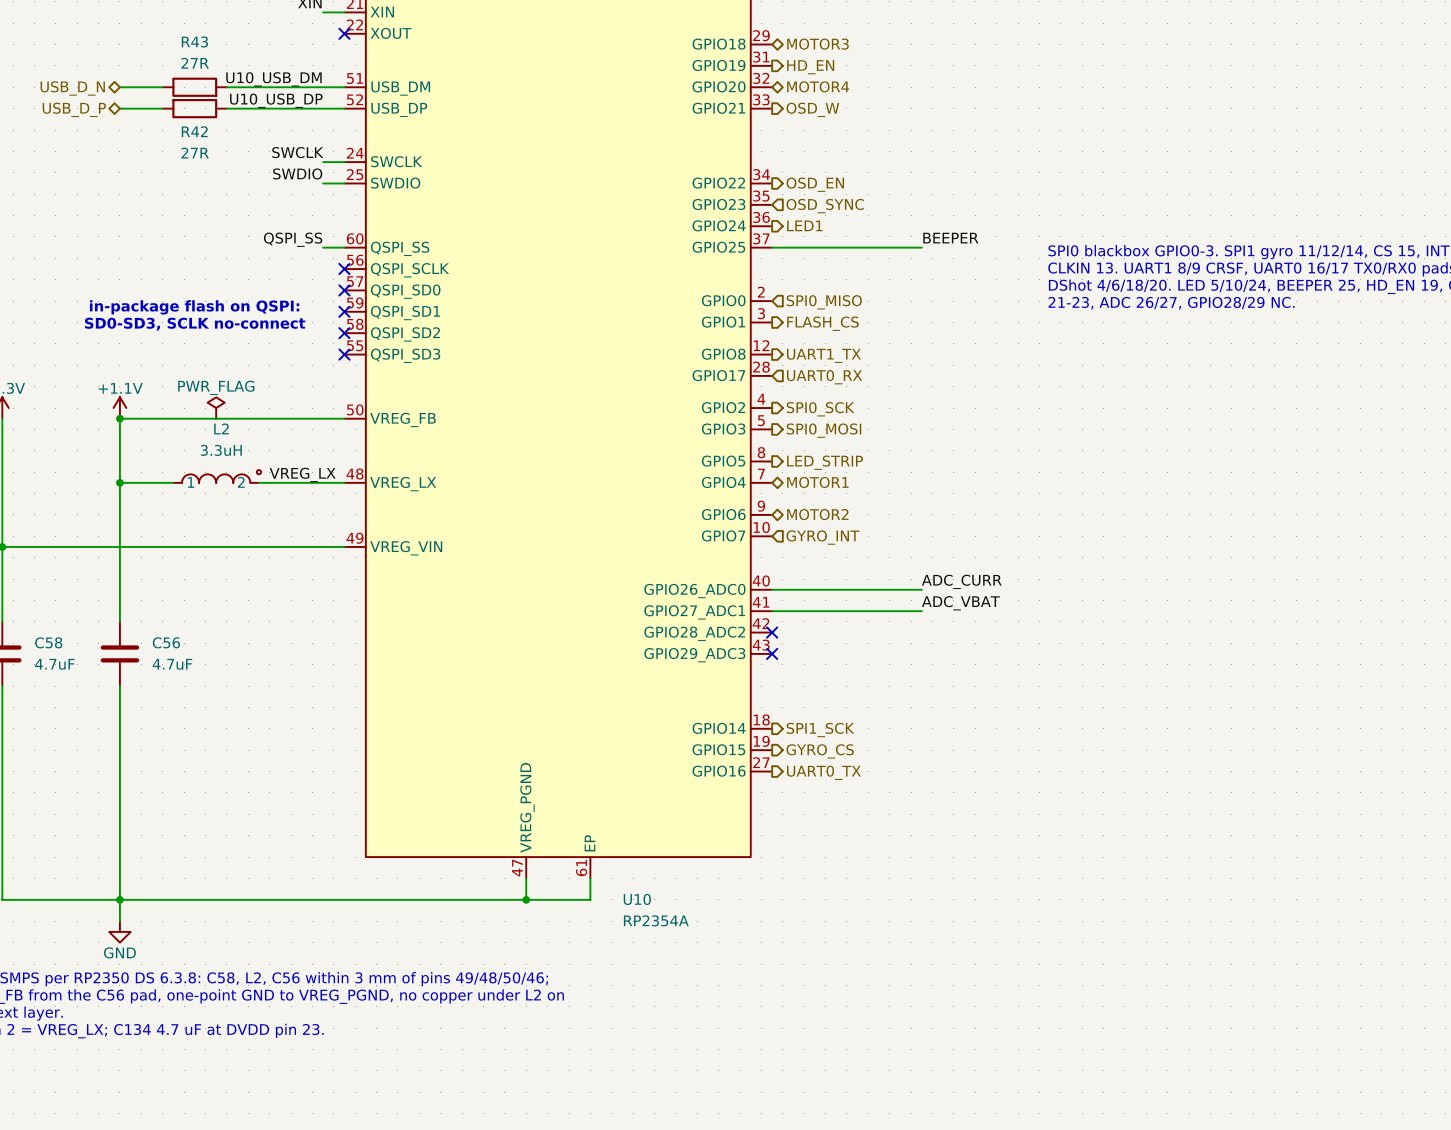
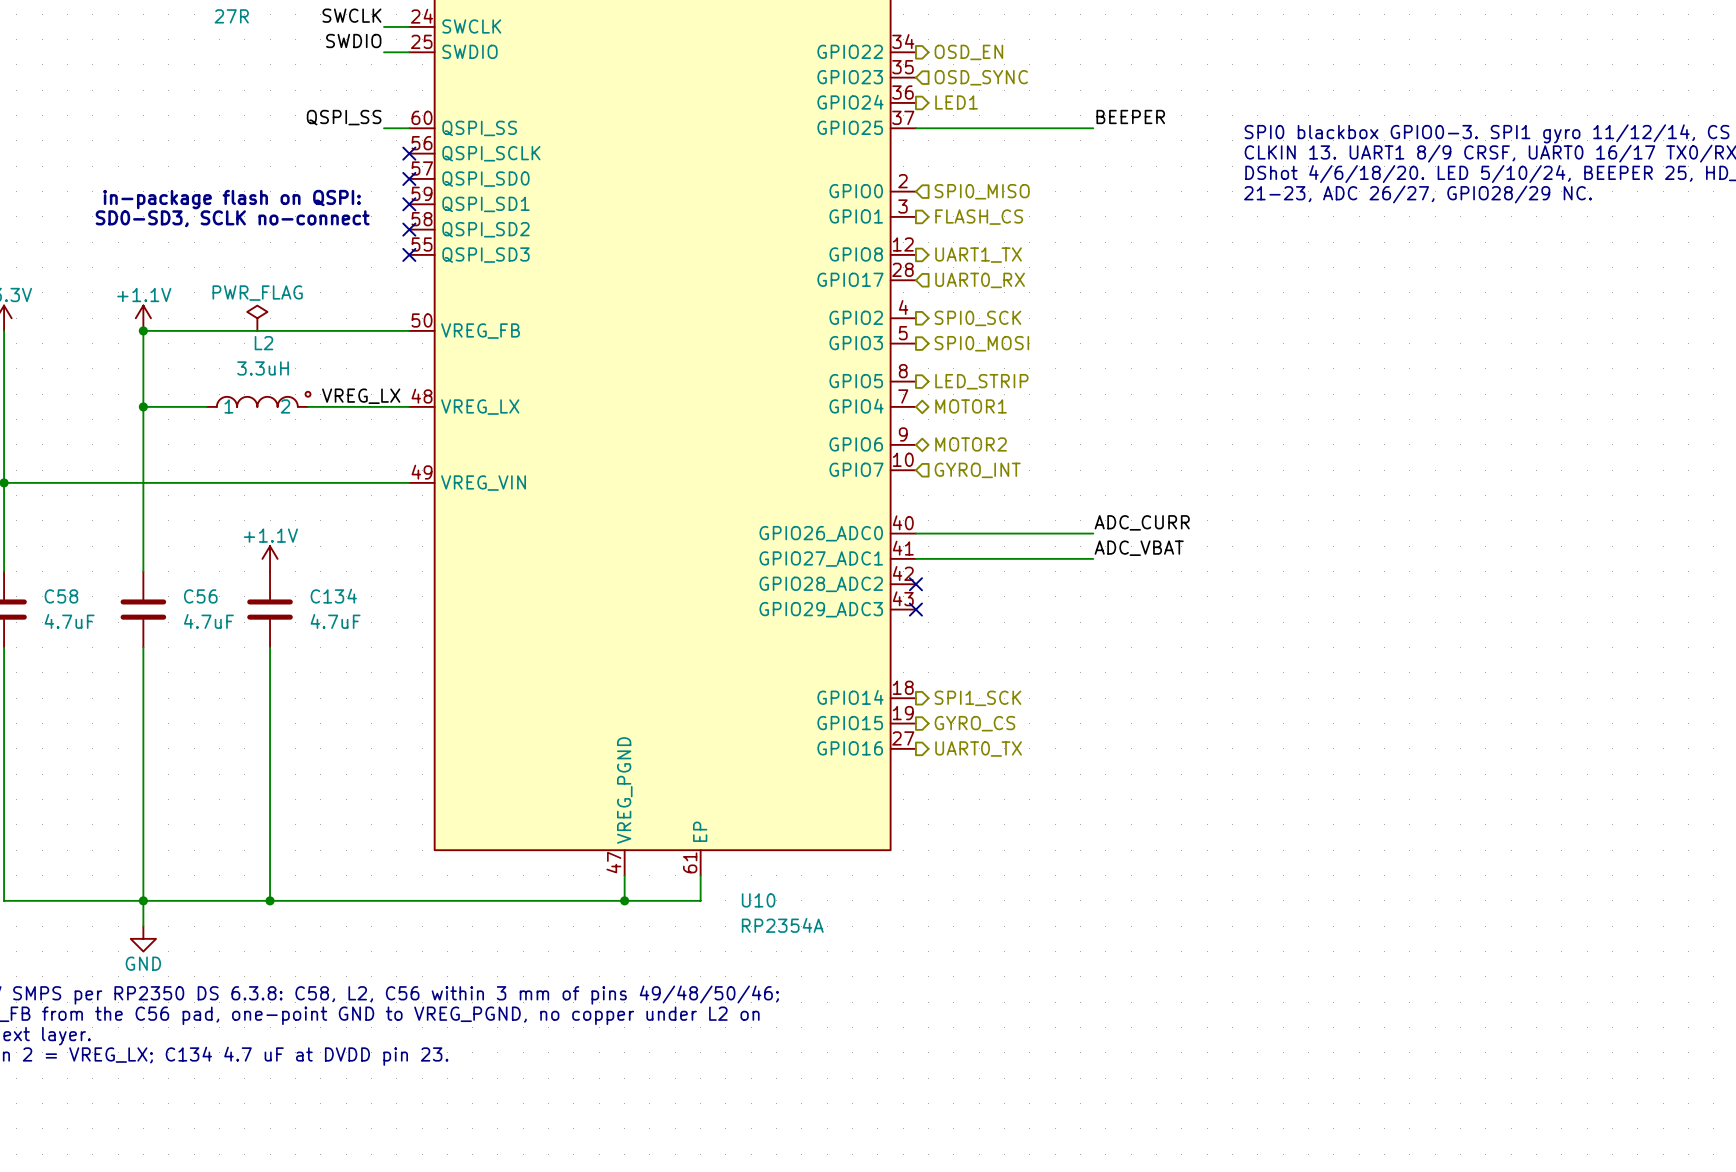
power symbol: none -> +1.1V (270, 558)
C134: none -> 4.7uF (270, 609)
wire: none -> (270, 647) (270, 900)
junction: none -> (270, 900)

